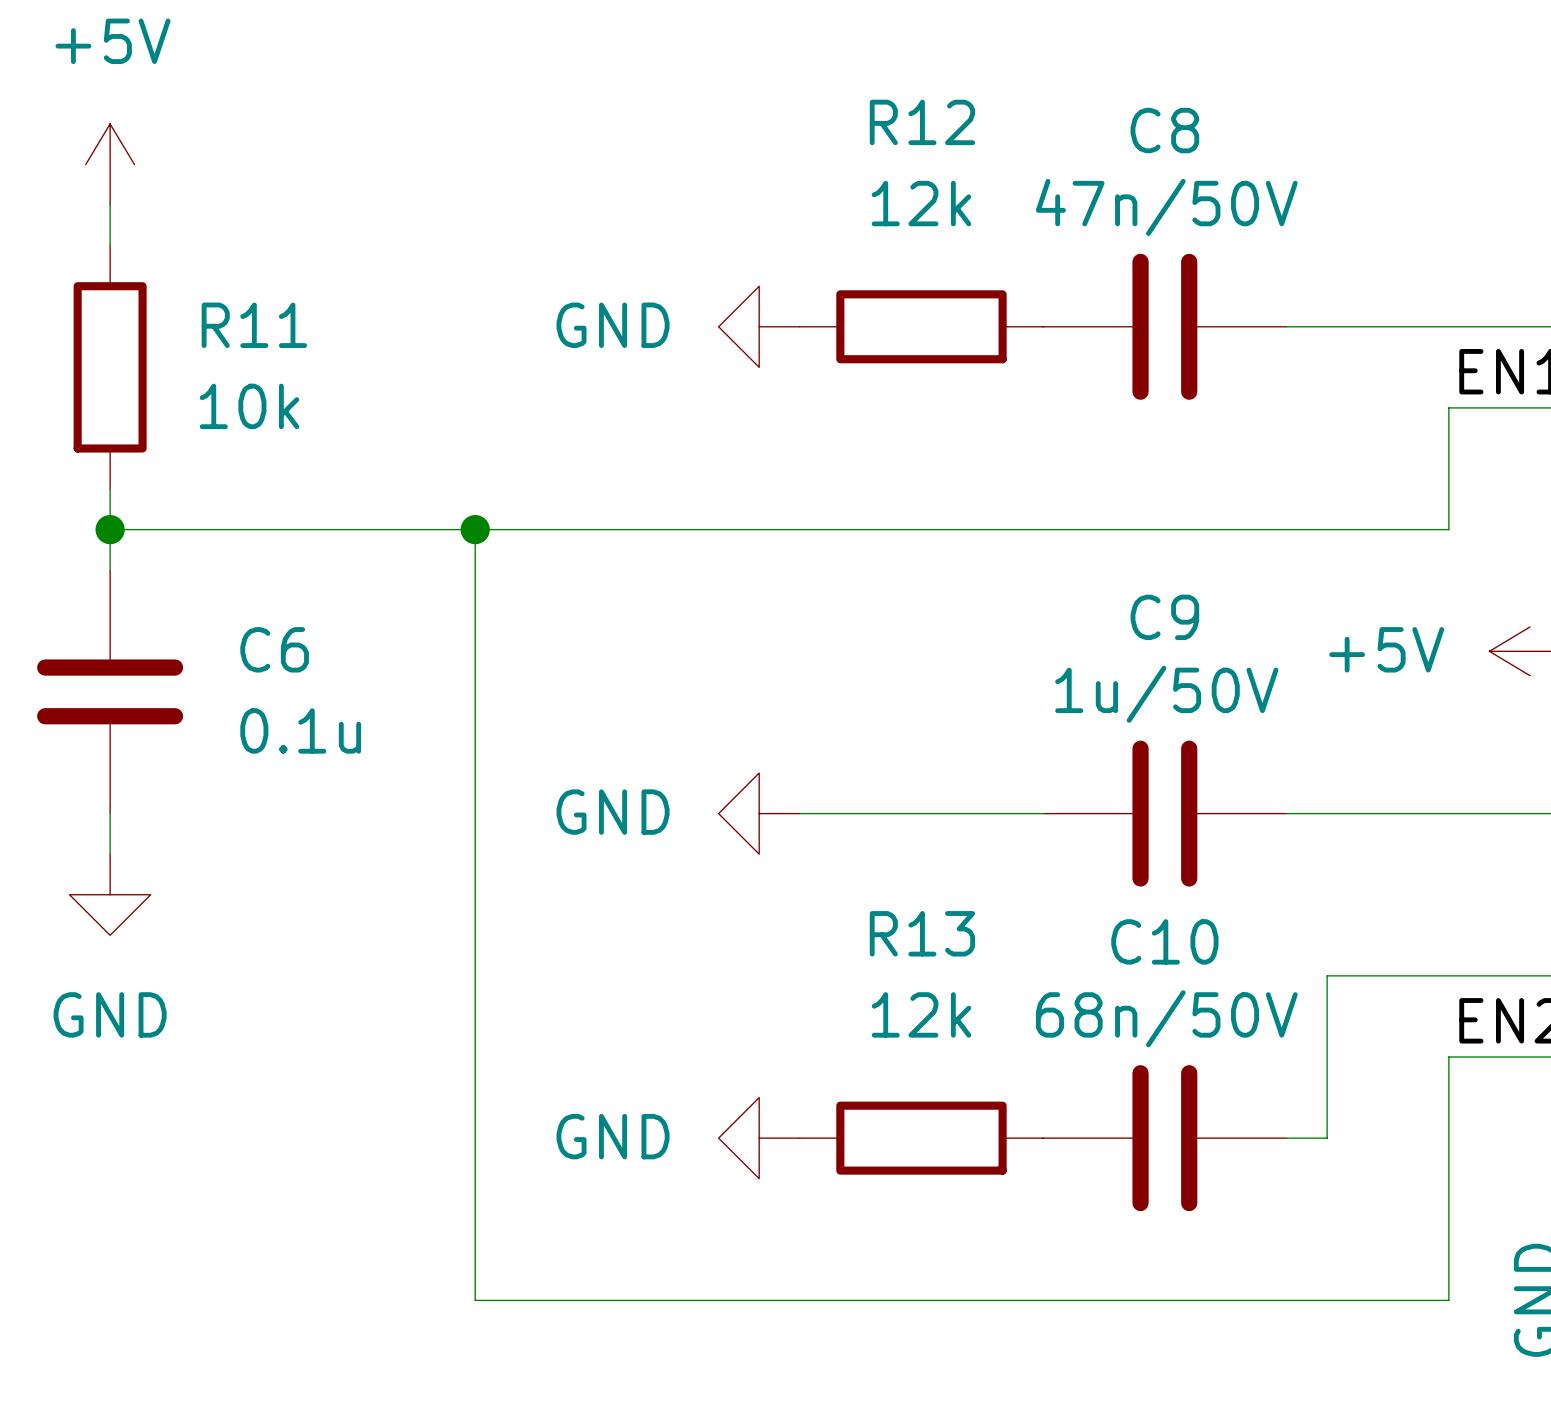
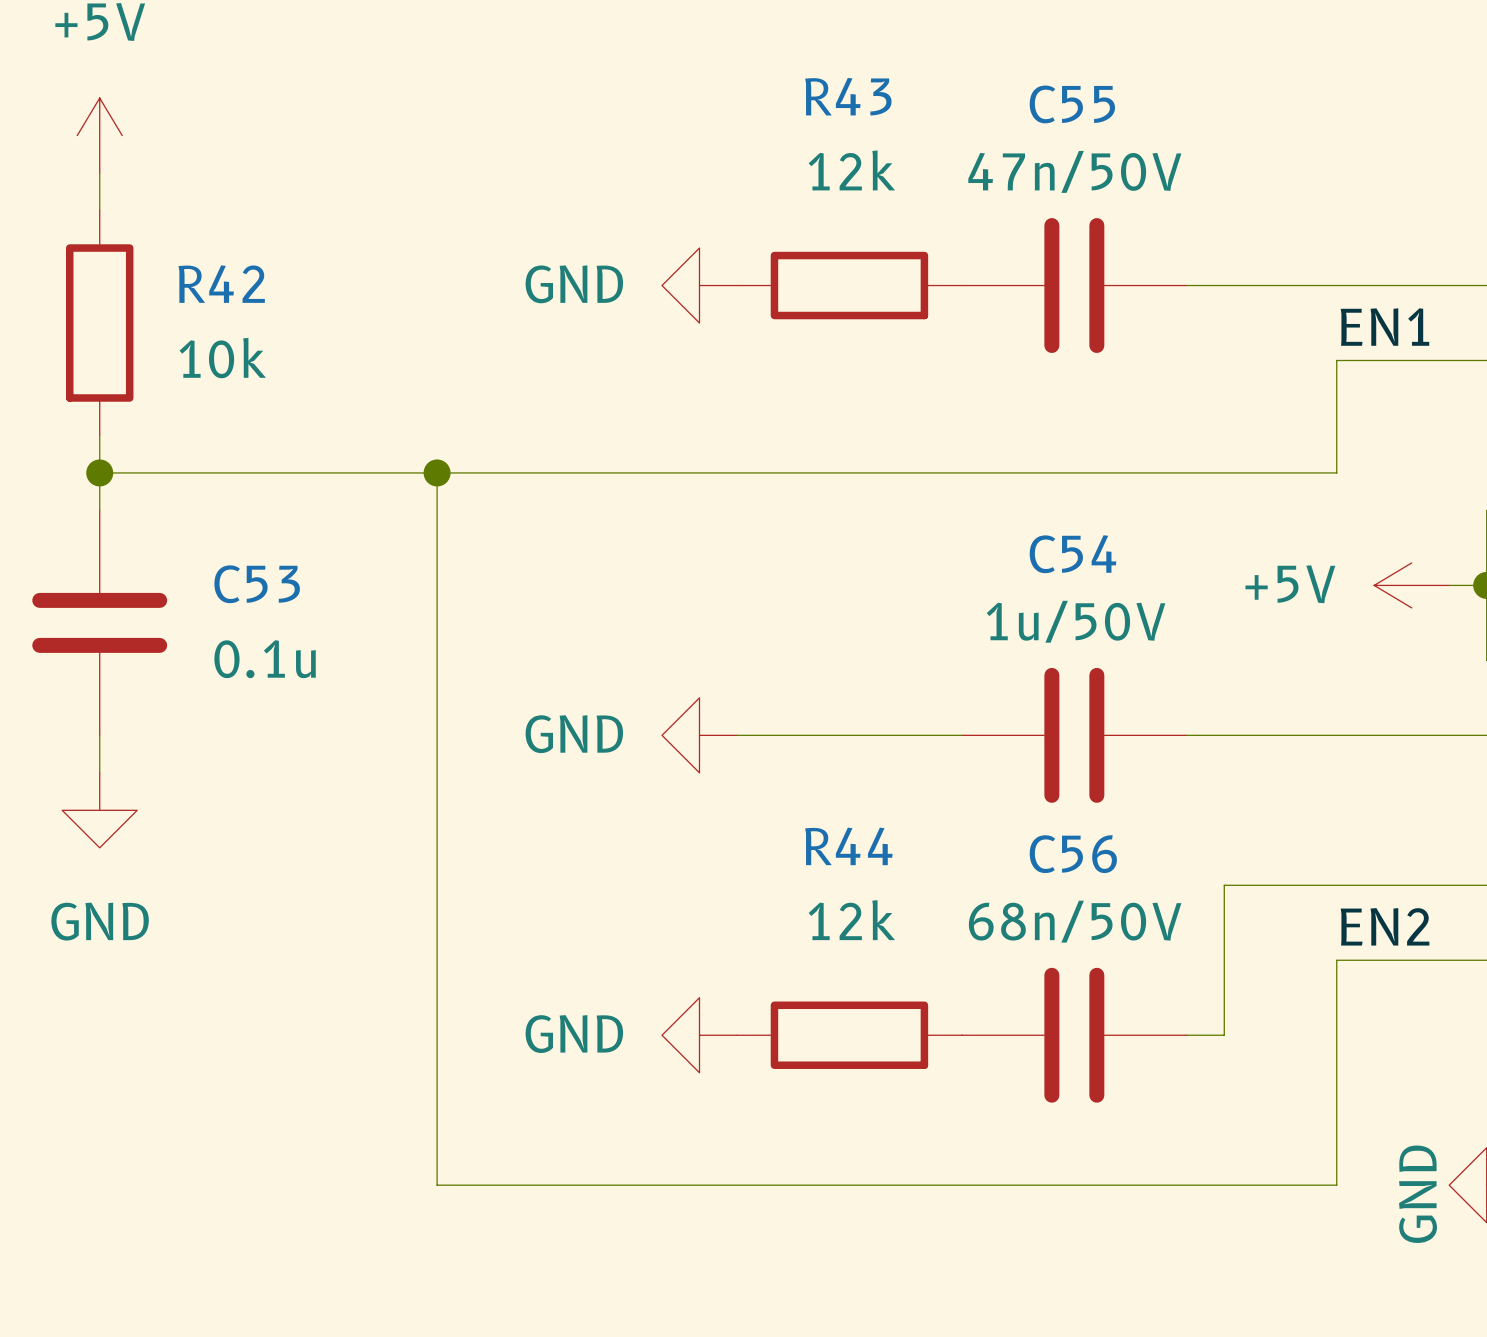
R12 name: R12 (922, 122) -> R43 (848, 96)
C8 name: C8 (1164, 130) -> C55 (1072, 104)
R11 name: R11 (254, 325) -> R42 (221, 284)
C9 name: C9 (1164, 617) -> C54 (1072, 554)
C6 name: C6 (274, 649) -> C53 (257, 584)
R13 name: R13 (922, 933) -> R44 (848, 846)
C10 name: C10 (1164, 941) -> C56 (1073, 854)

